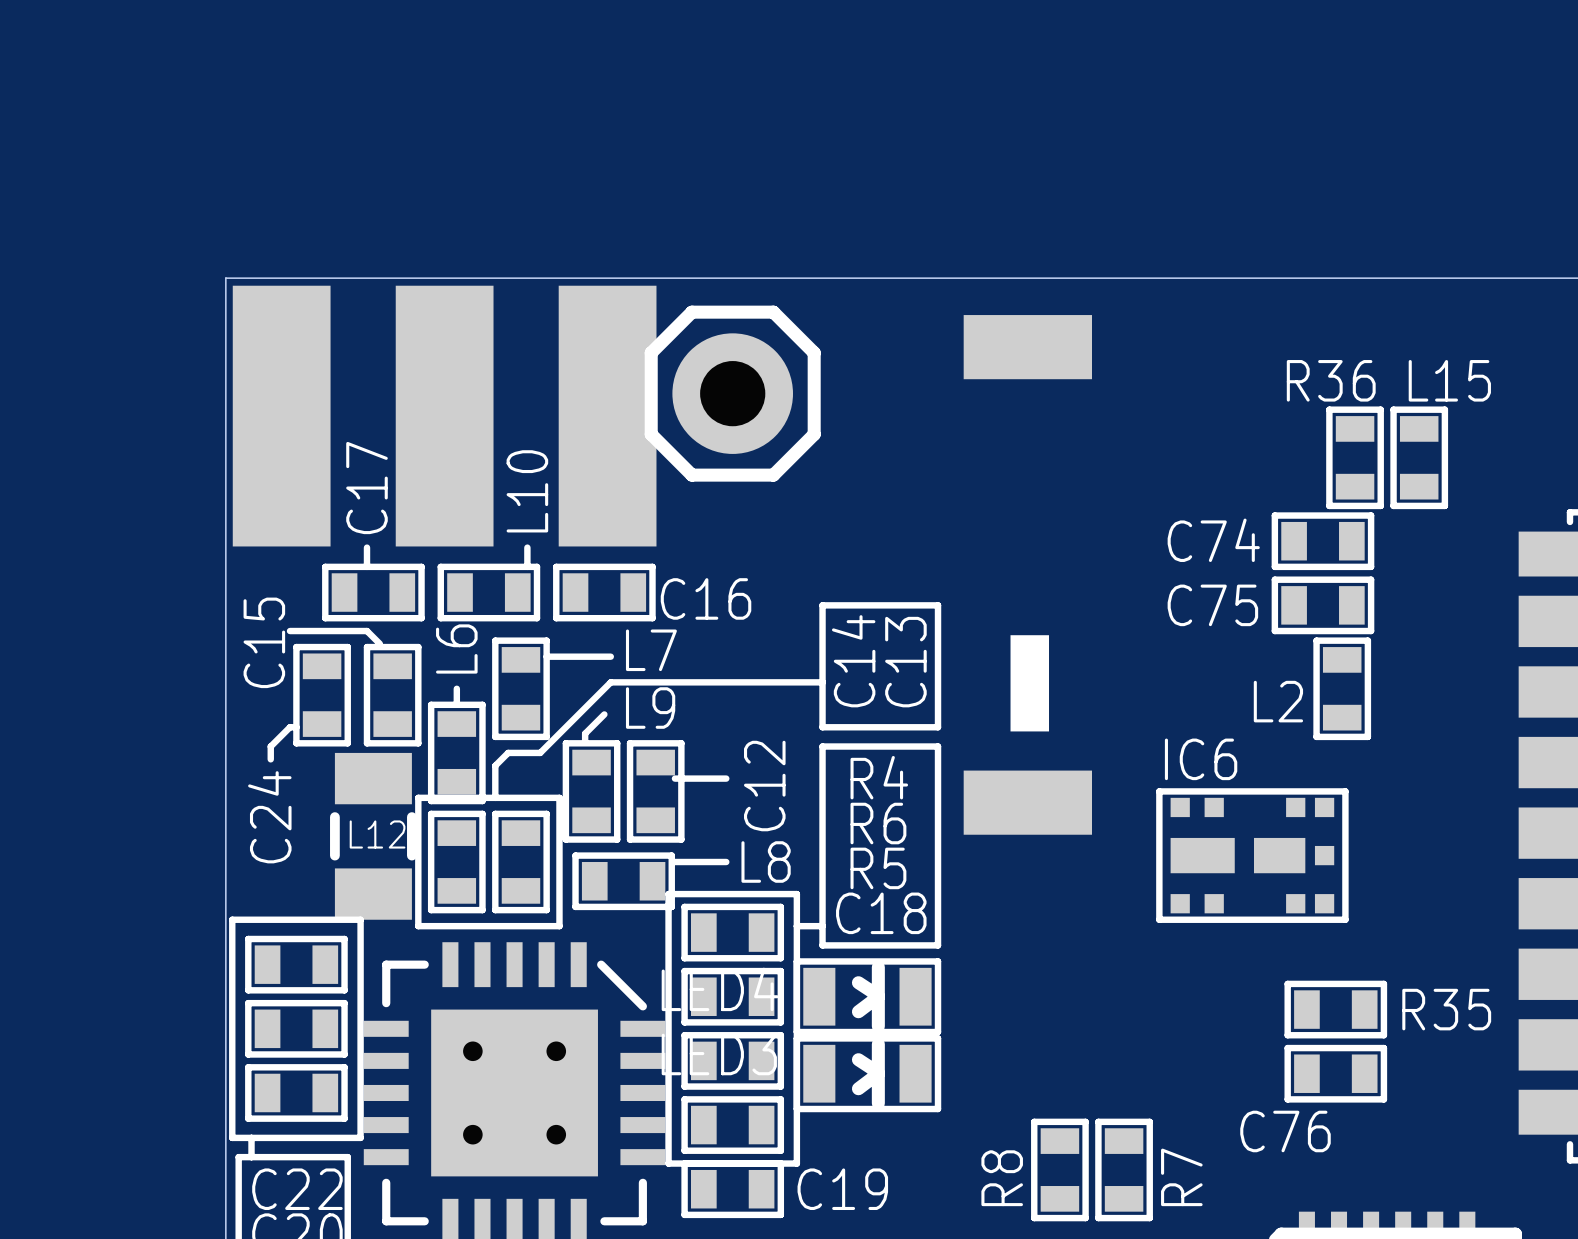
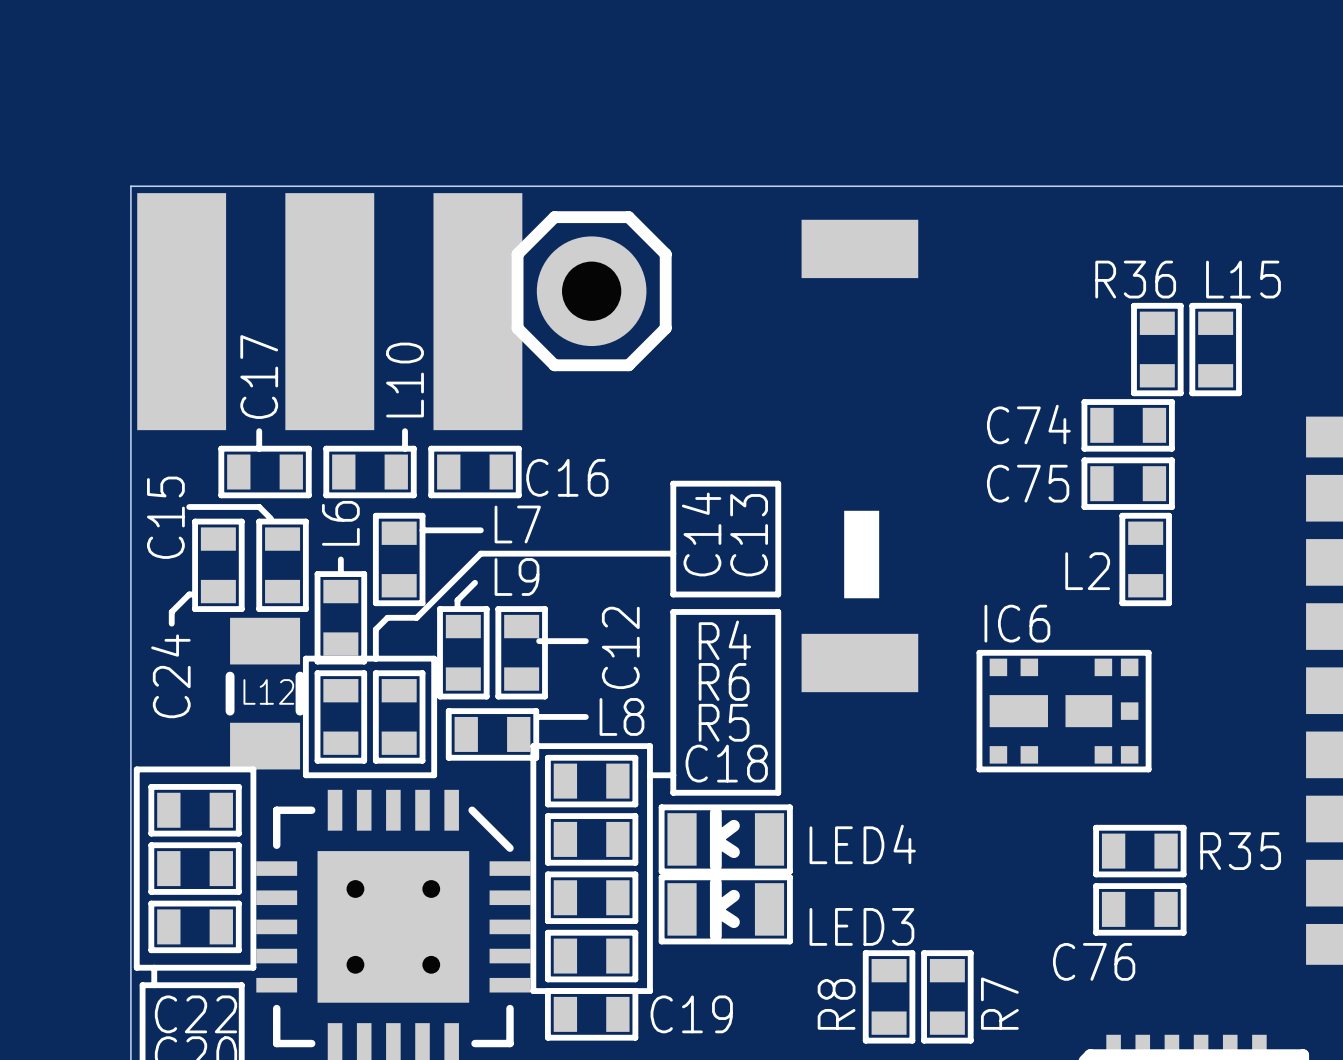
LED4 rotation: 0° (867, 996) -> 180° (725, 839)
LED3 rotation: 0° (867, 1073) -> 180° (725, 909)

